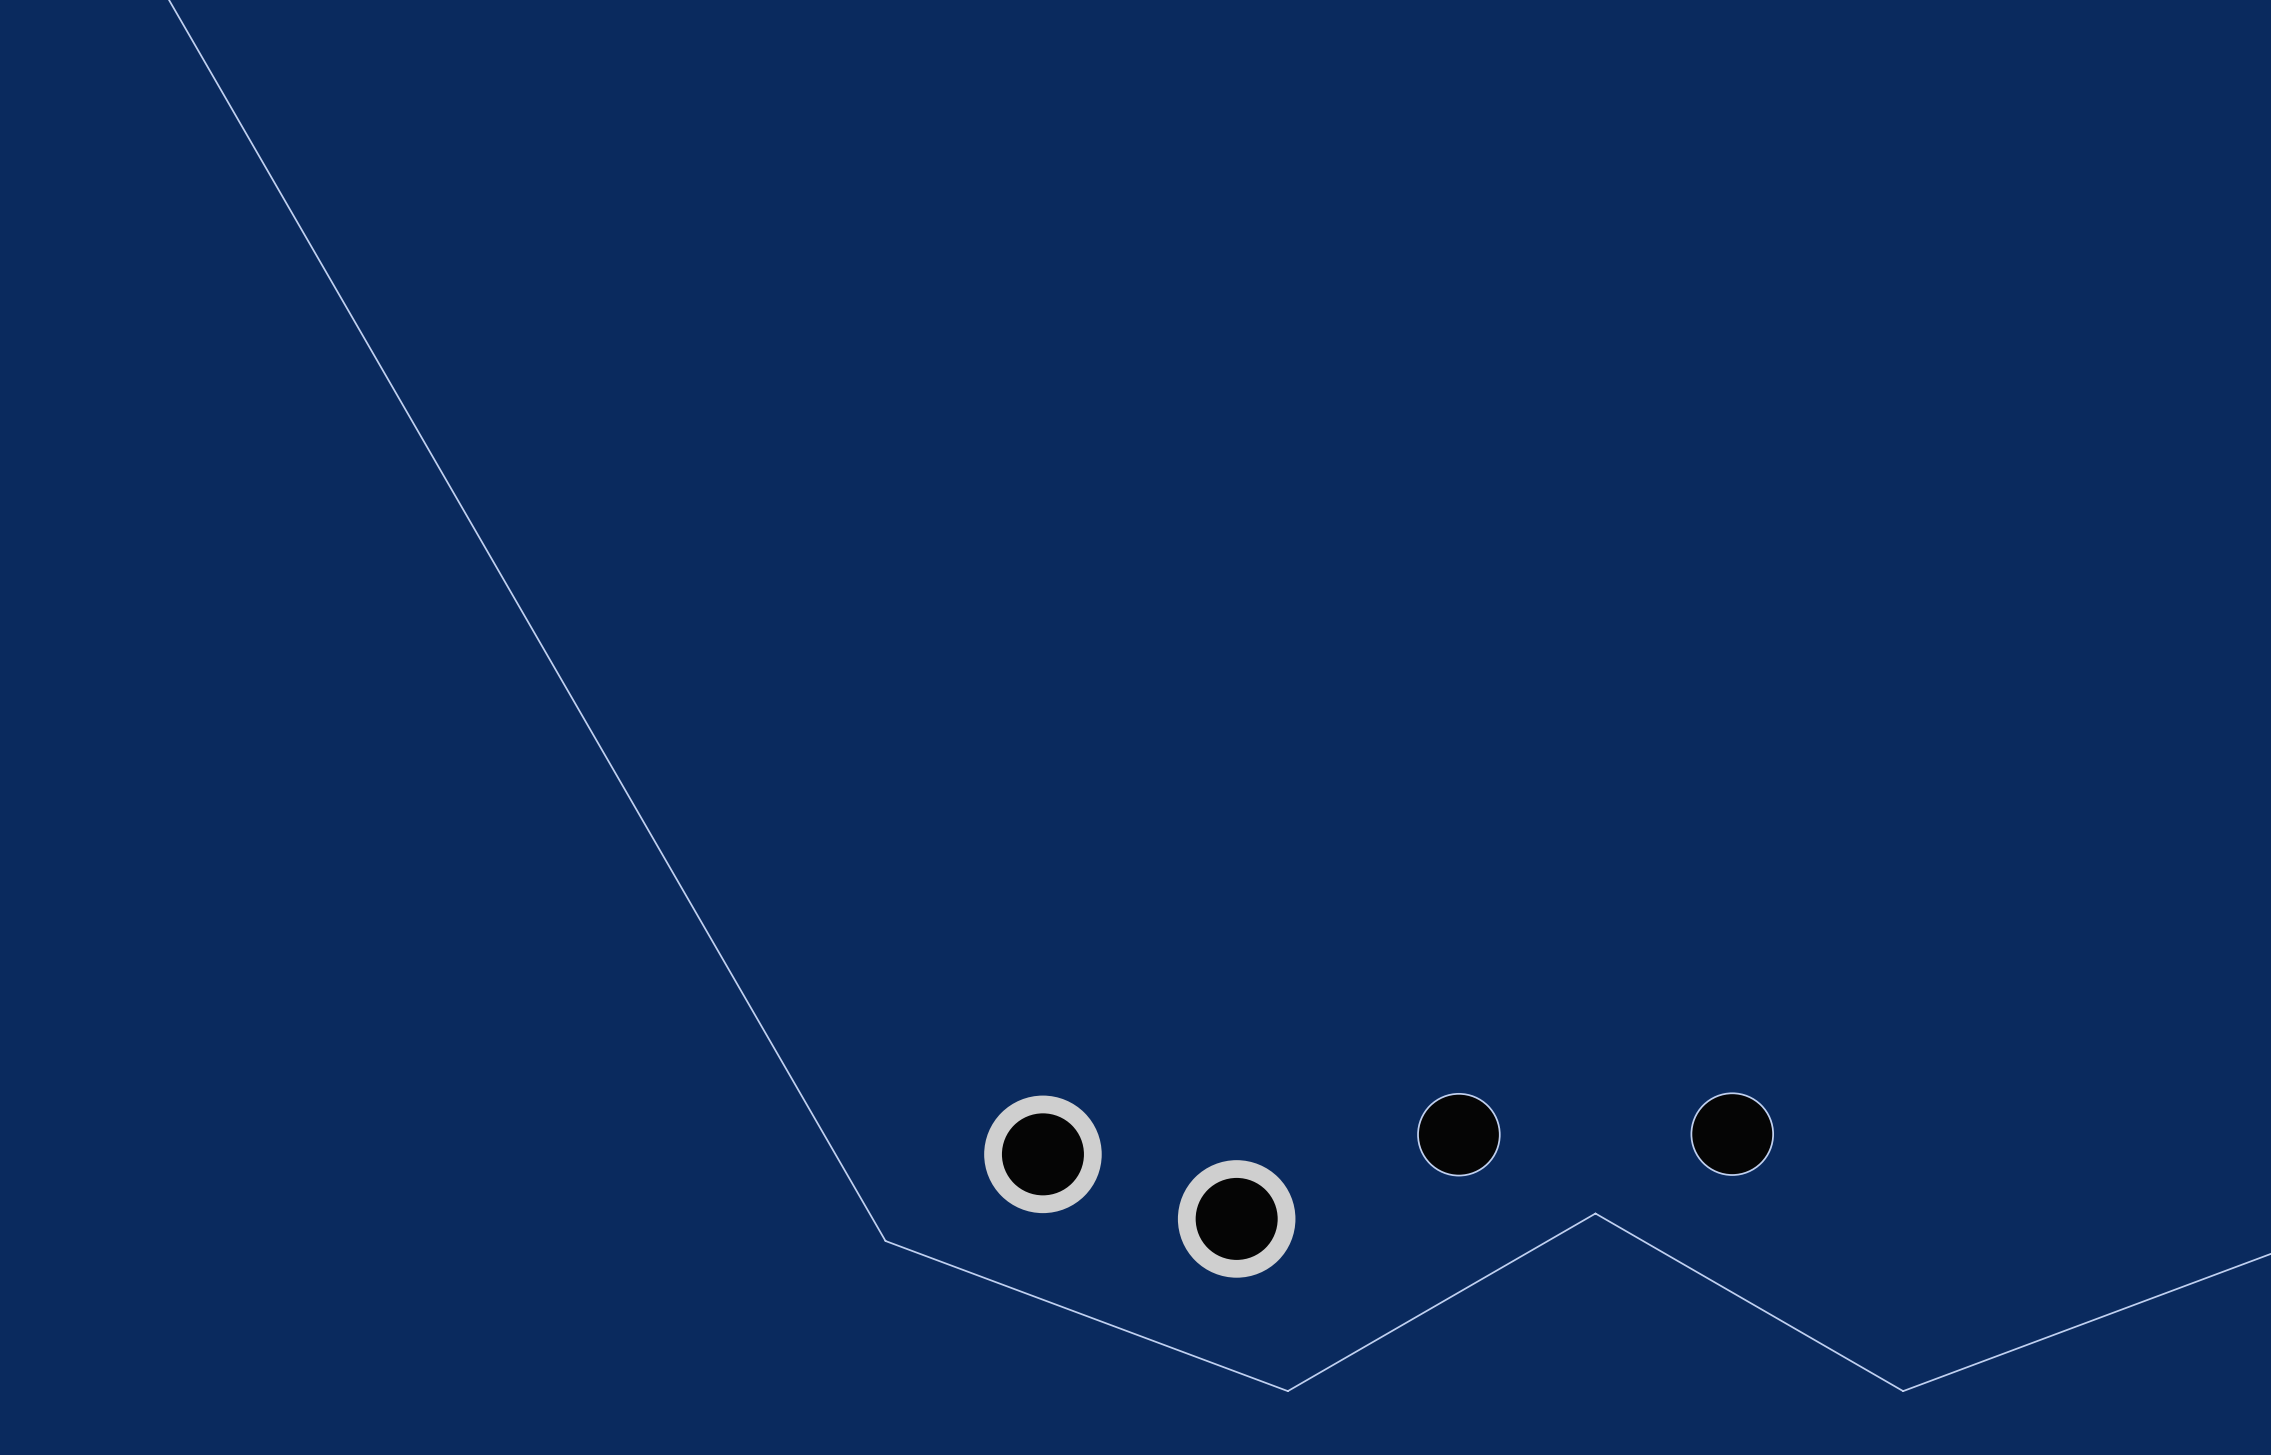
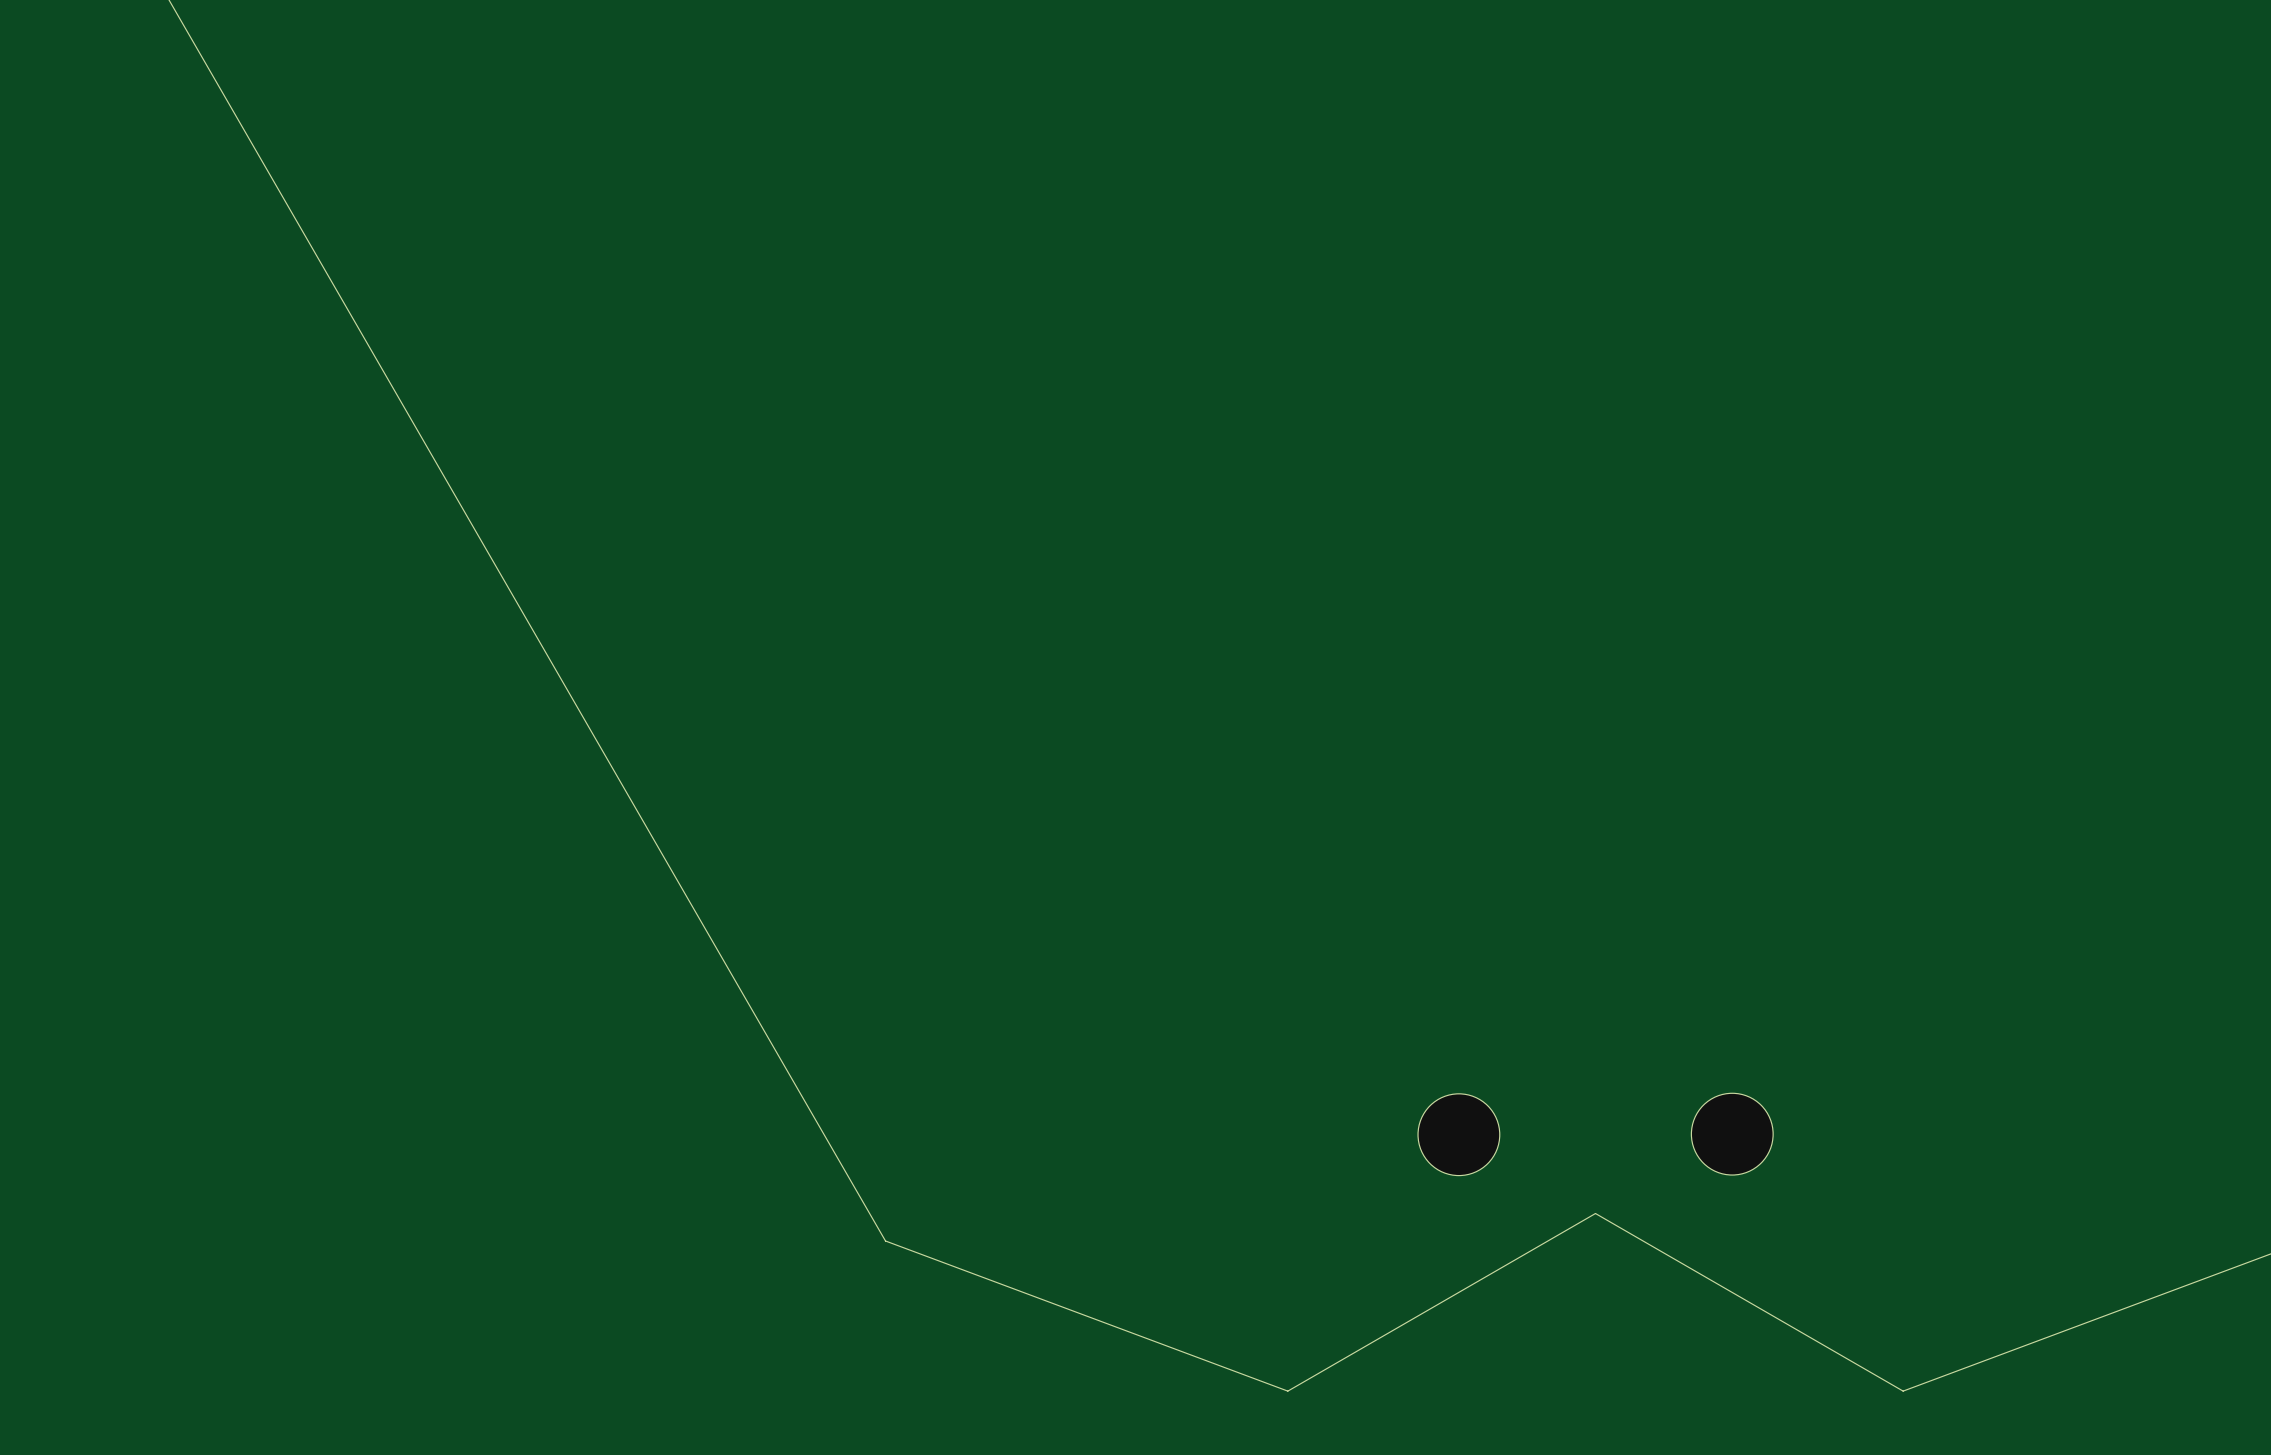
part: (1042, 1154) -> none
part: (1236, 1218) -> none

